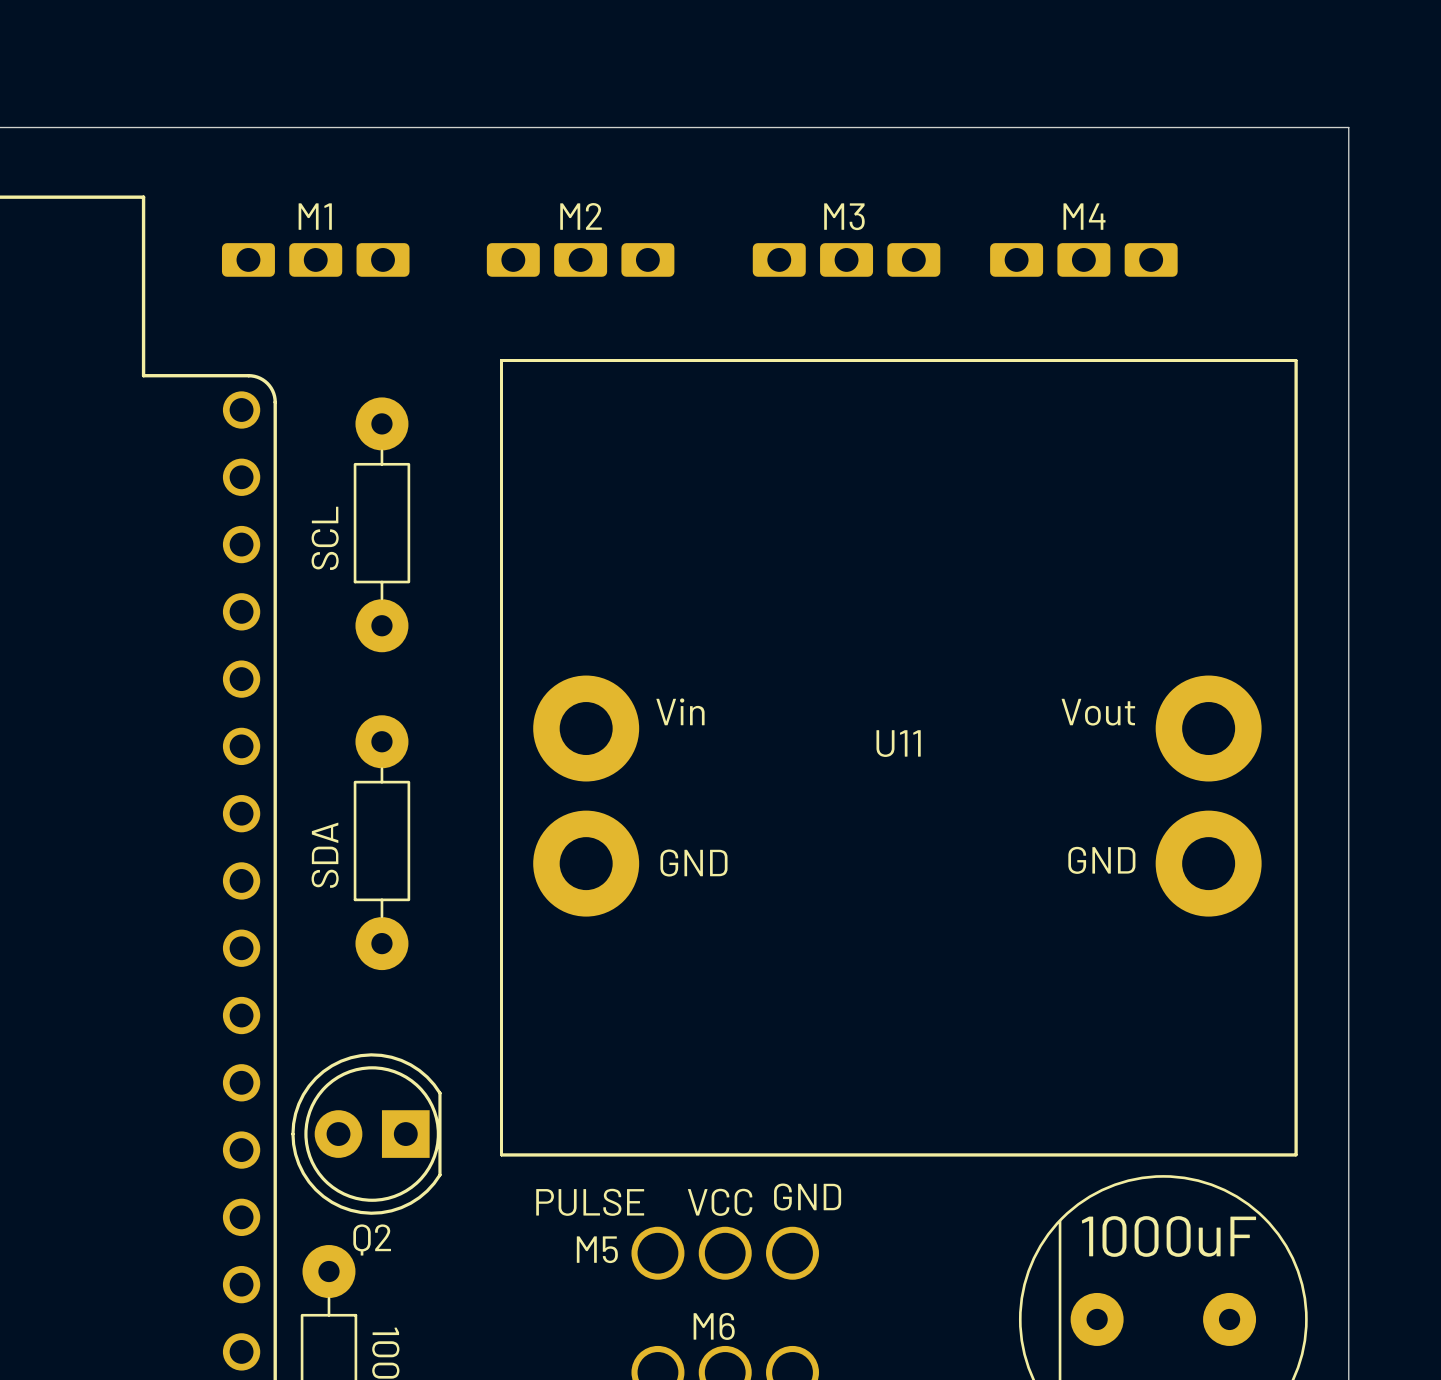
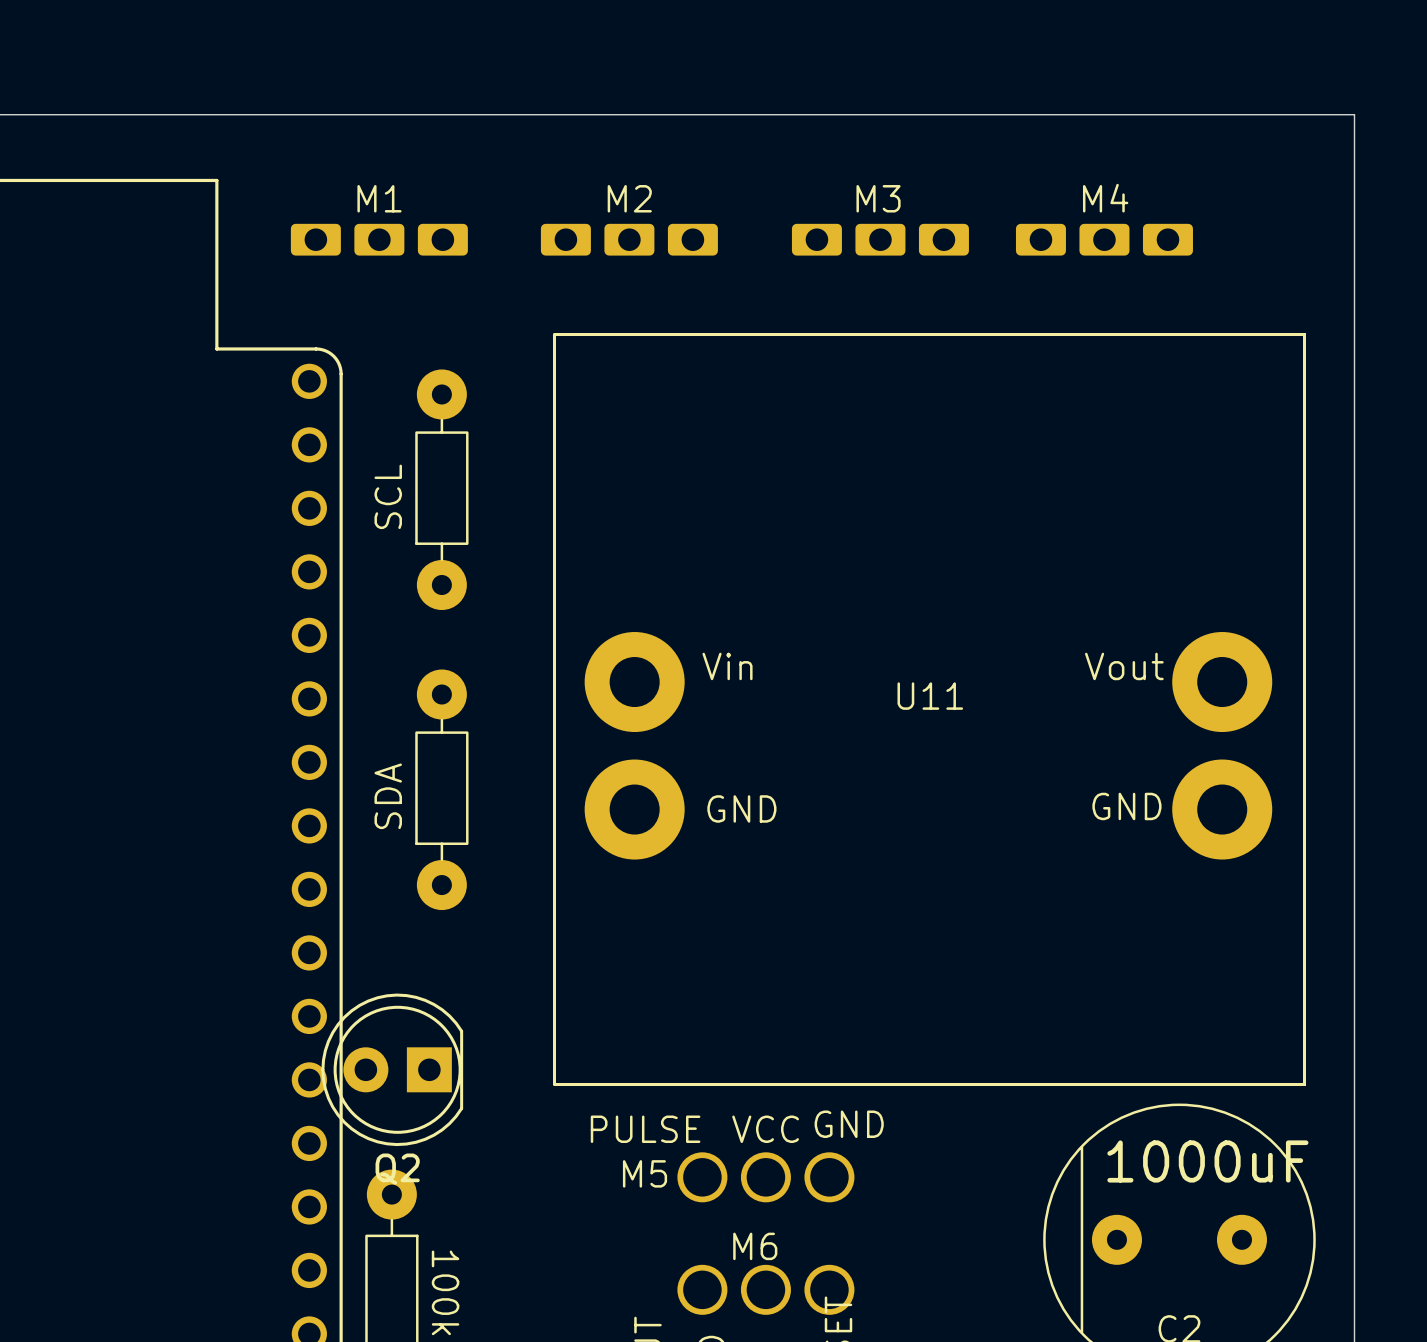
Q2 position: (366, 1134) -> (392, 1069)

